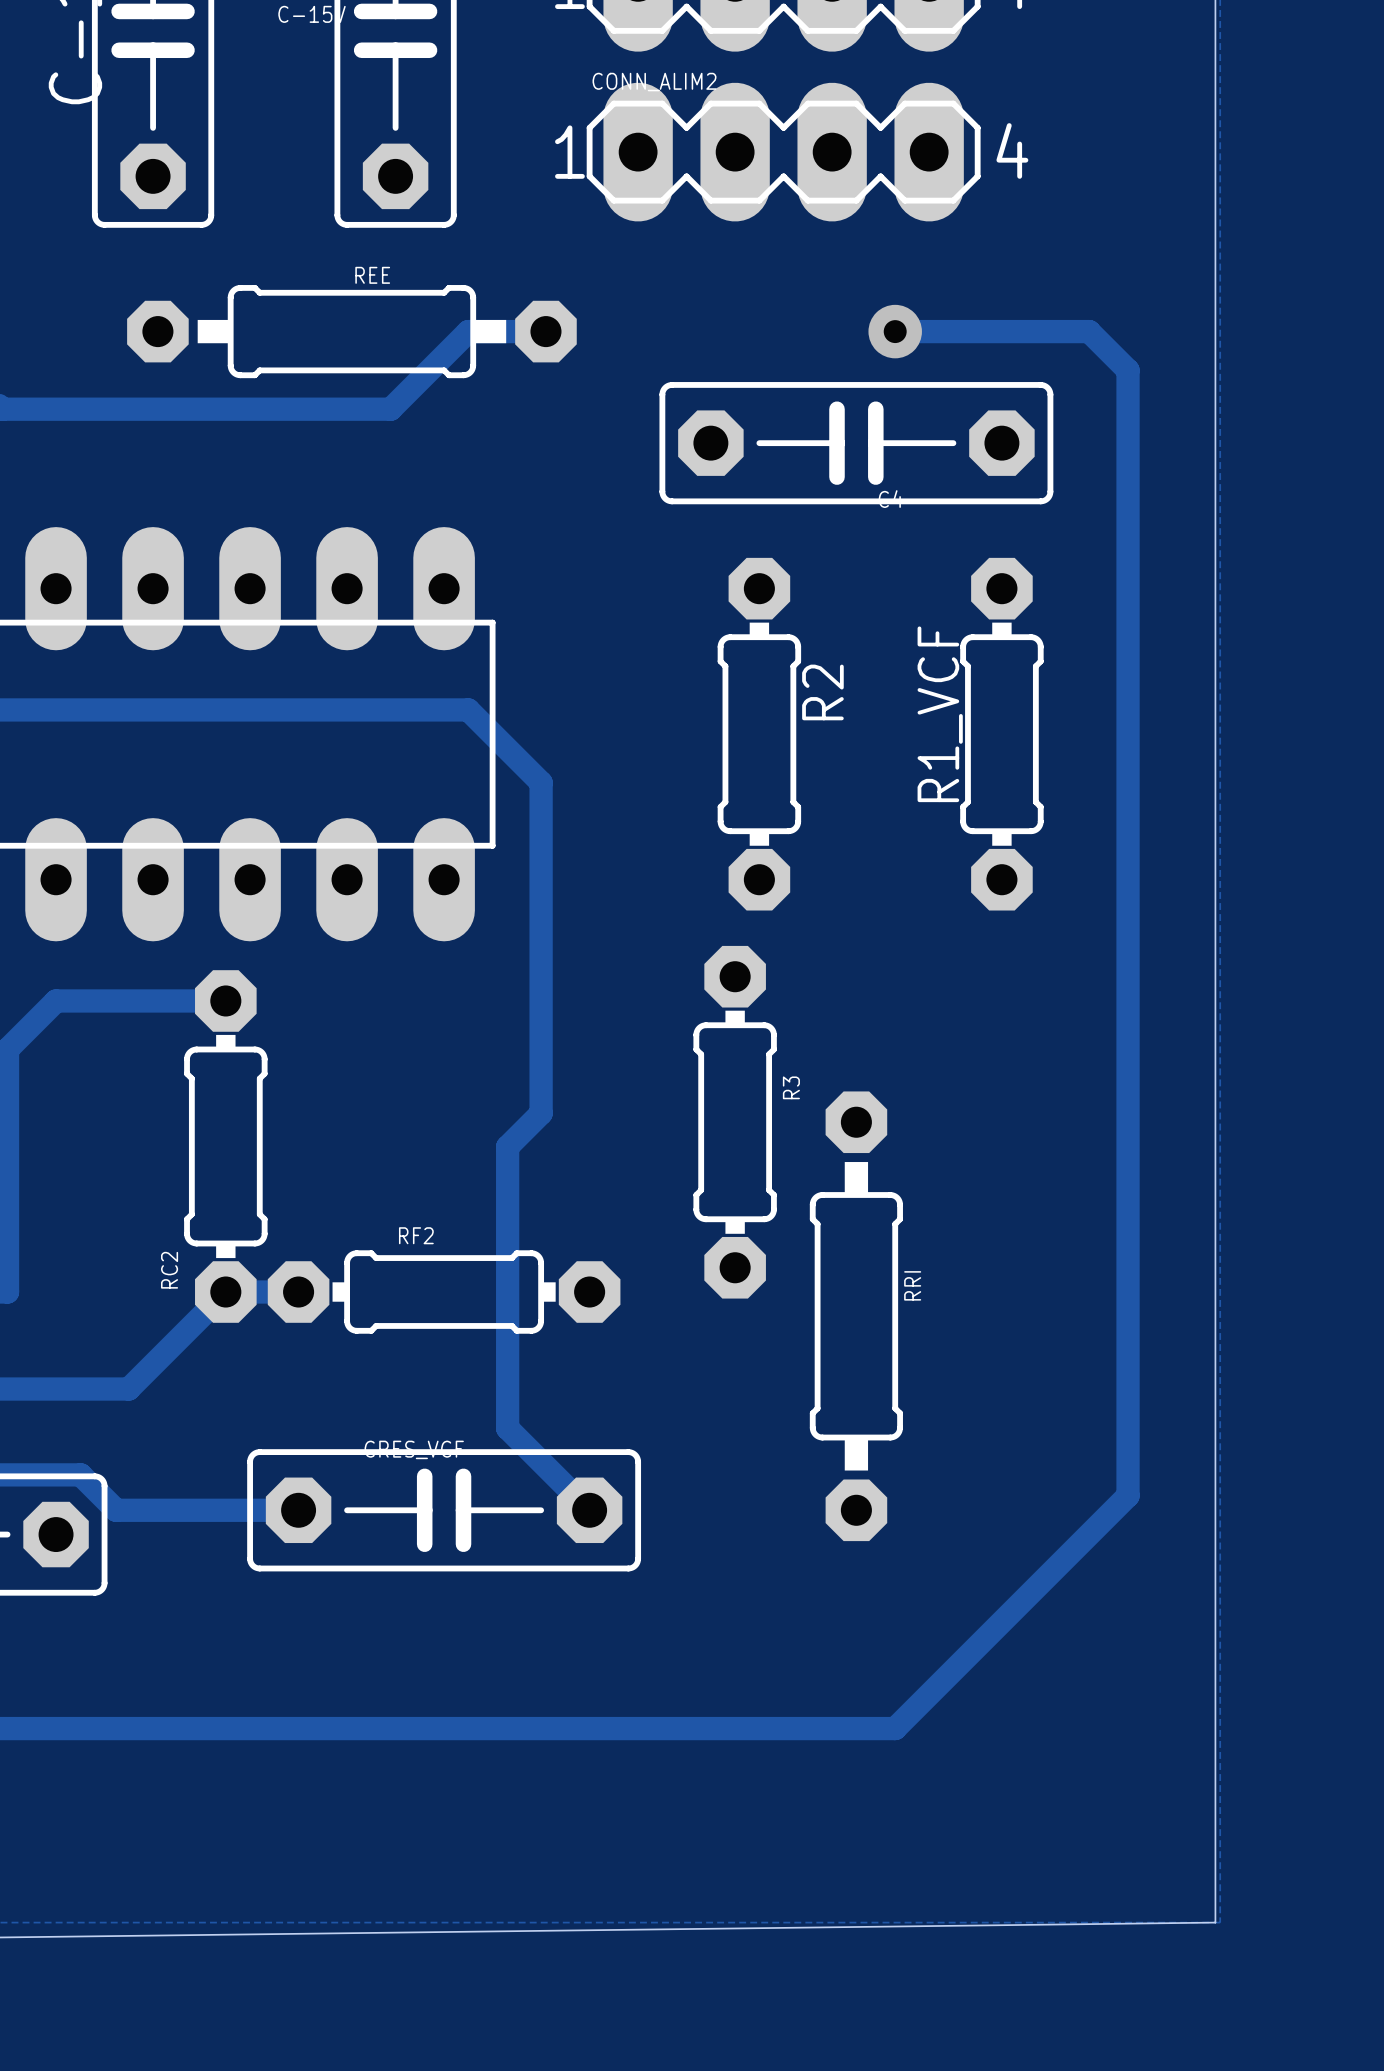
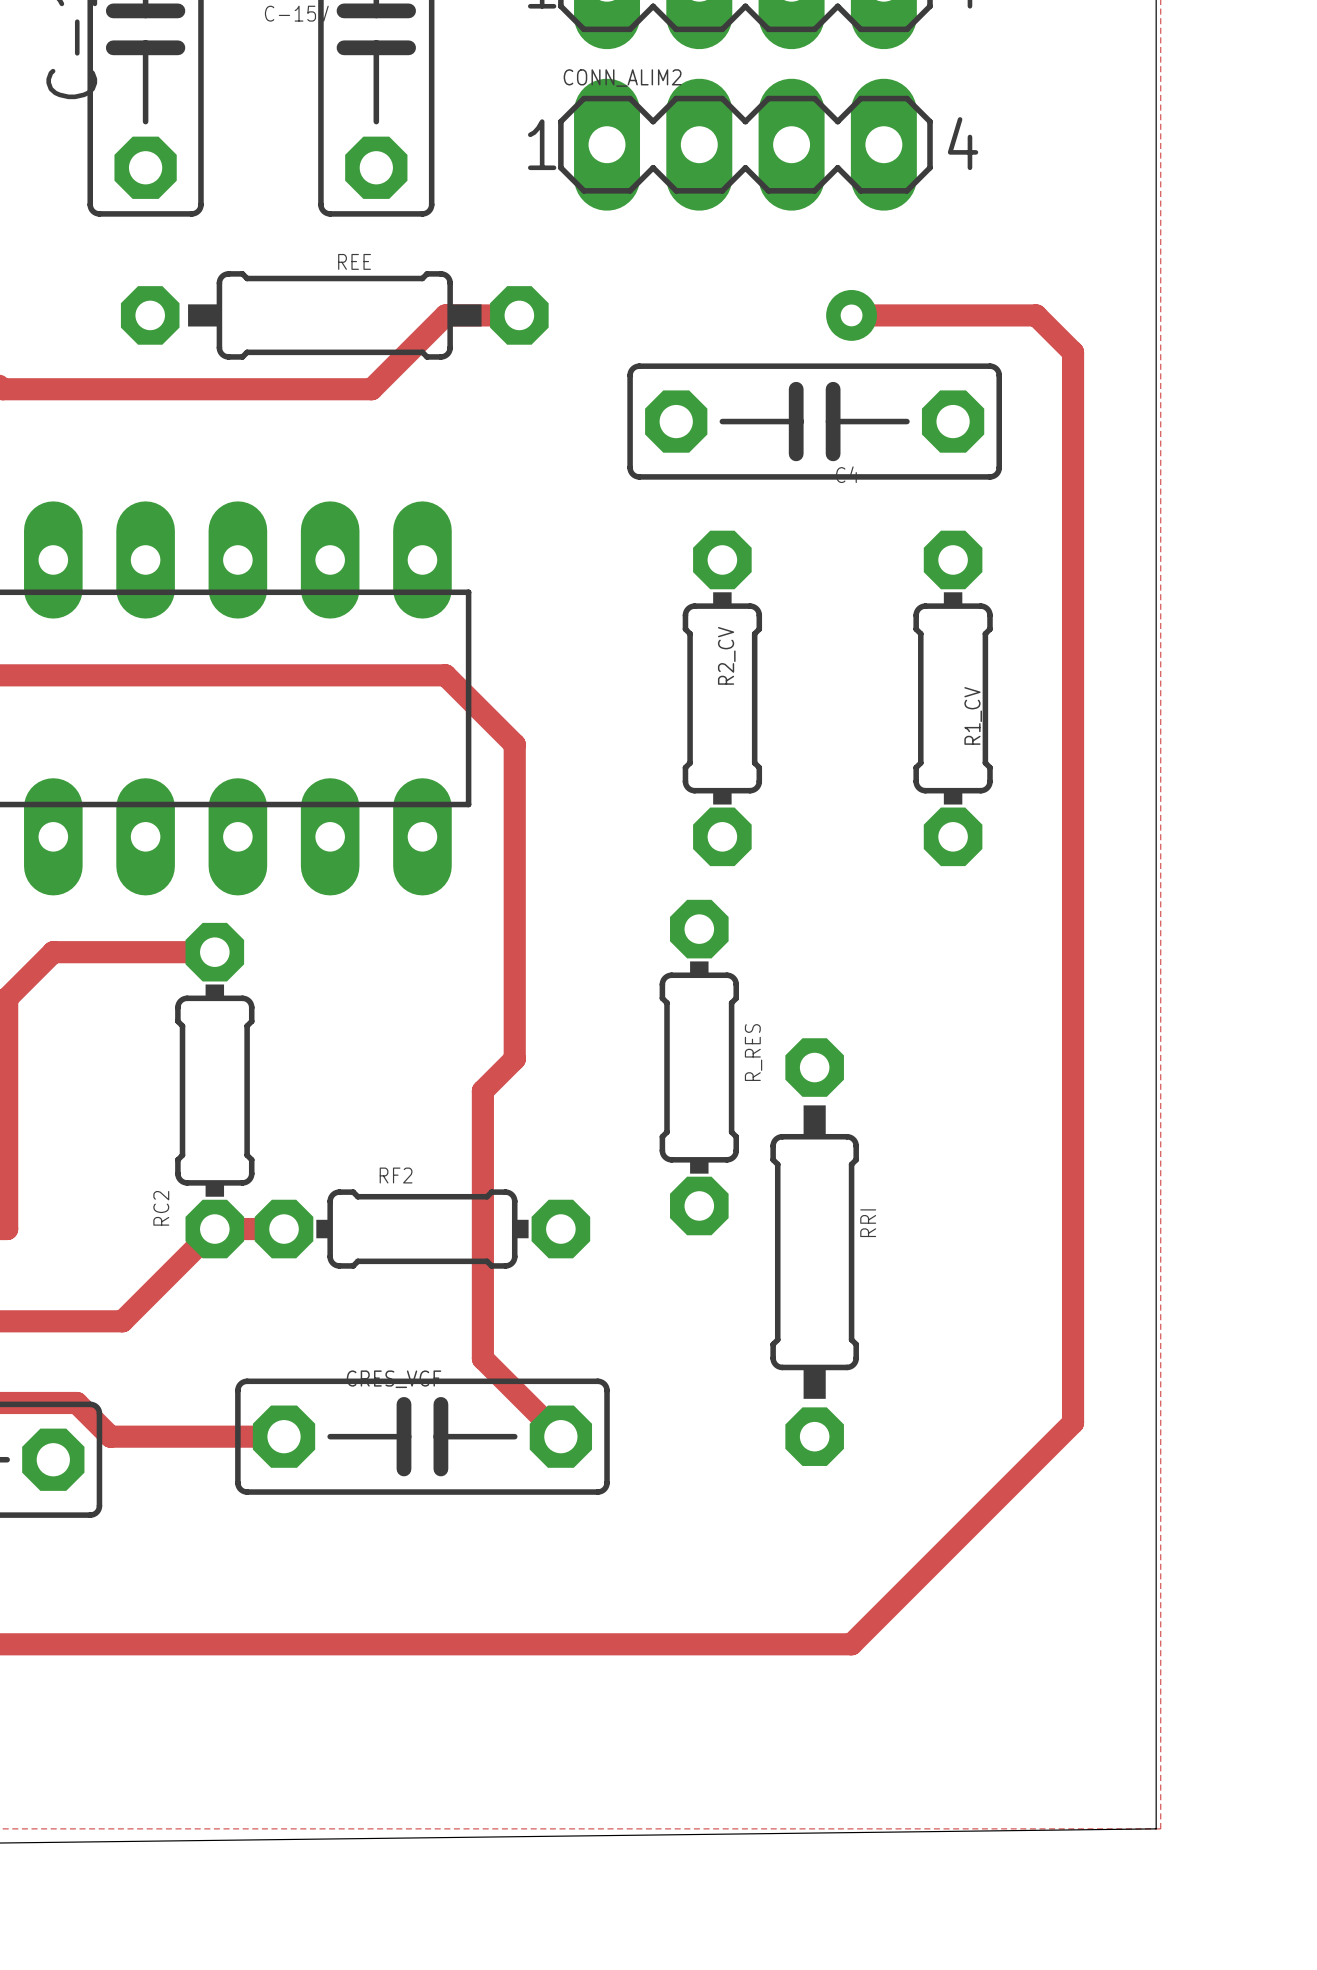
R2 name: R2 (822, 692) -> R2_CV (726, 655)
R1_VCF name: R1_VCF (940, 714) -> R1_CV (973, 715)
R3 name: R3 (791, 1087) -> R_RES (753, 1052)

